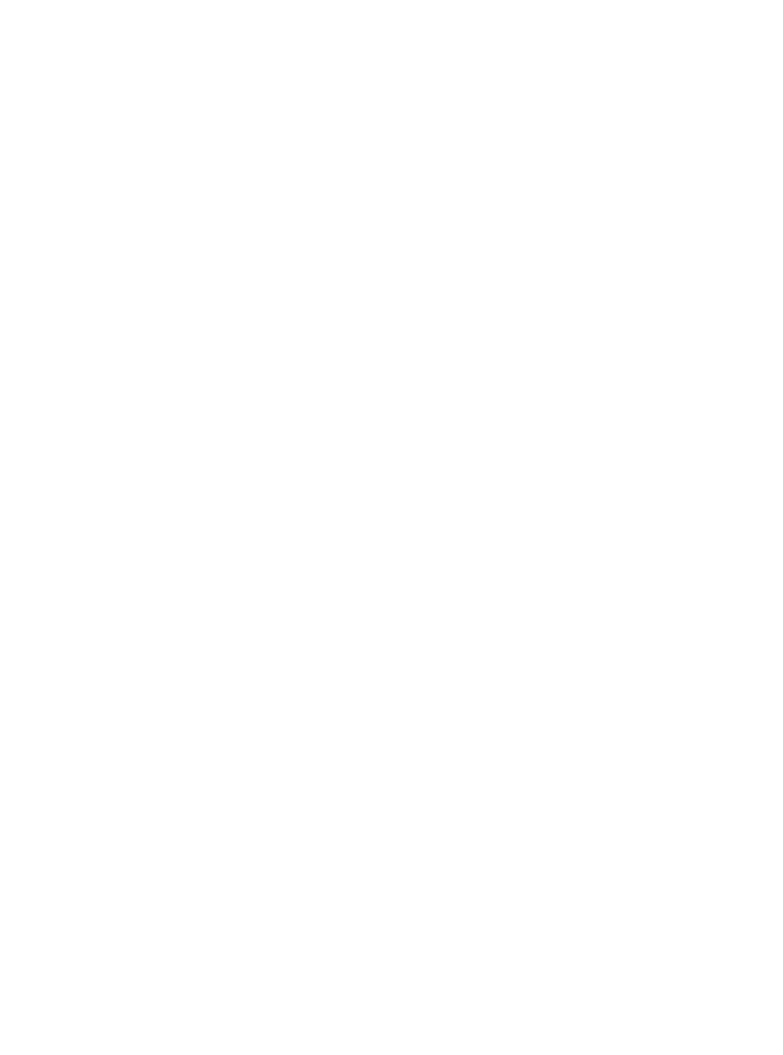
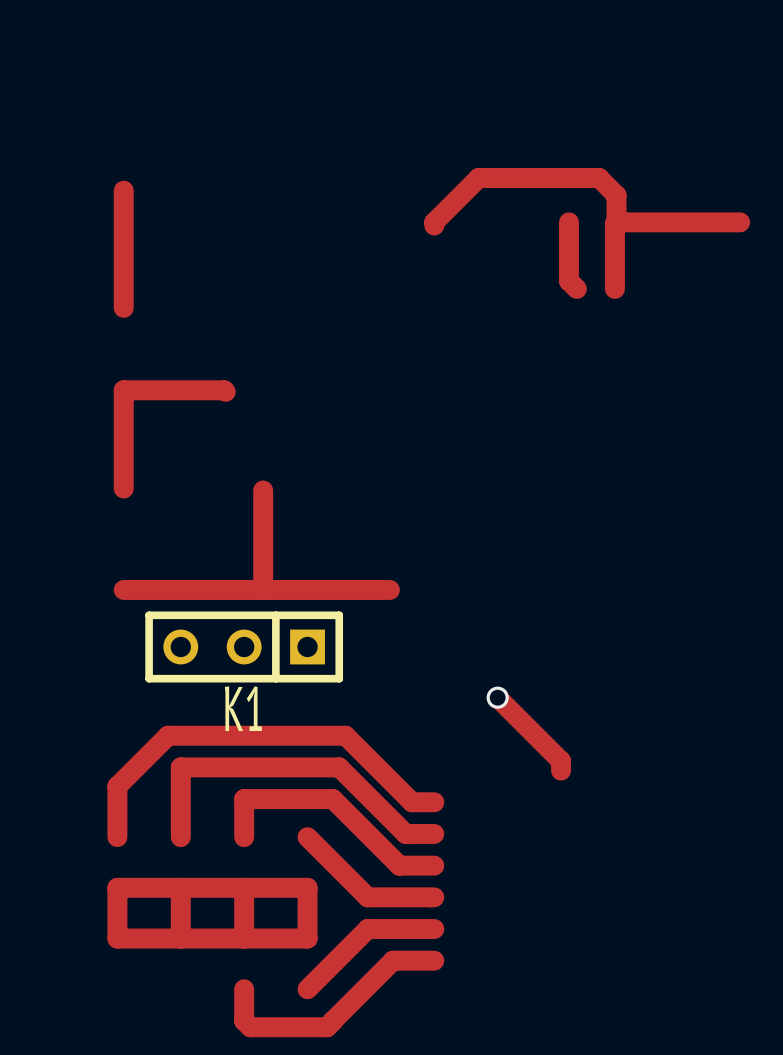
track: none -> (123, 190) (123, 307)
track: none -> (568, 222) (568, 280) (576, 288)
track: none -> (616, 222) (740, 222)
track: none -> (616, 222) (614, 223) (614, 288)
track: none -> (616, 222) (616, 195) (599, 178) (478, 178) (434, 222) (434, 225)
track: none -> (225, 391) (123, 390) (123, 488)
track: none -> (263, 490) (263, 589)
track: none -> (123, 589) (389, 589)
K1: none -> (244, 647)
track: none -> (497, 697) (561, 761) (561, 770)
via: none -> (497, 697)
track: none -> (434, 802) (412, 802) (345, 735) (168, 735) (117, 786) (117, 837)
track: none -> (434, 833) (405, 833) (339, 767) (180, 767) (180, 837)
track: none -> (244, 837) (244, 799) (332, 799) (399, 865) (434, 865)
track: none -> (307, 837) (367, 897) (434, 897) (431, 900)
track: none -> (117, 887) (117, 938) (307, 938) (307, 887) (117, 887)
track: none -> (180, 887) (180, 938)
track: none -> (244, 887) (244, 938)
track: none -> (434, 929) (367, 929) (307, 989)
track: none -> (434, 960) (393, 960) (332, 1020)
track: none -> (244, 989) (244, 1020) (250, 1027) (327, 1027) (333, 1020)

